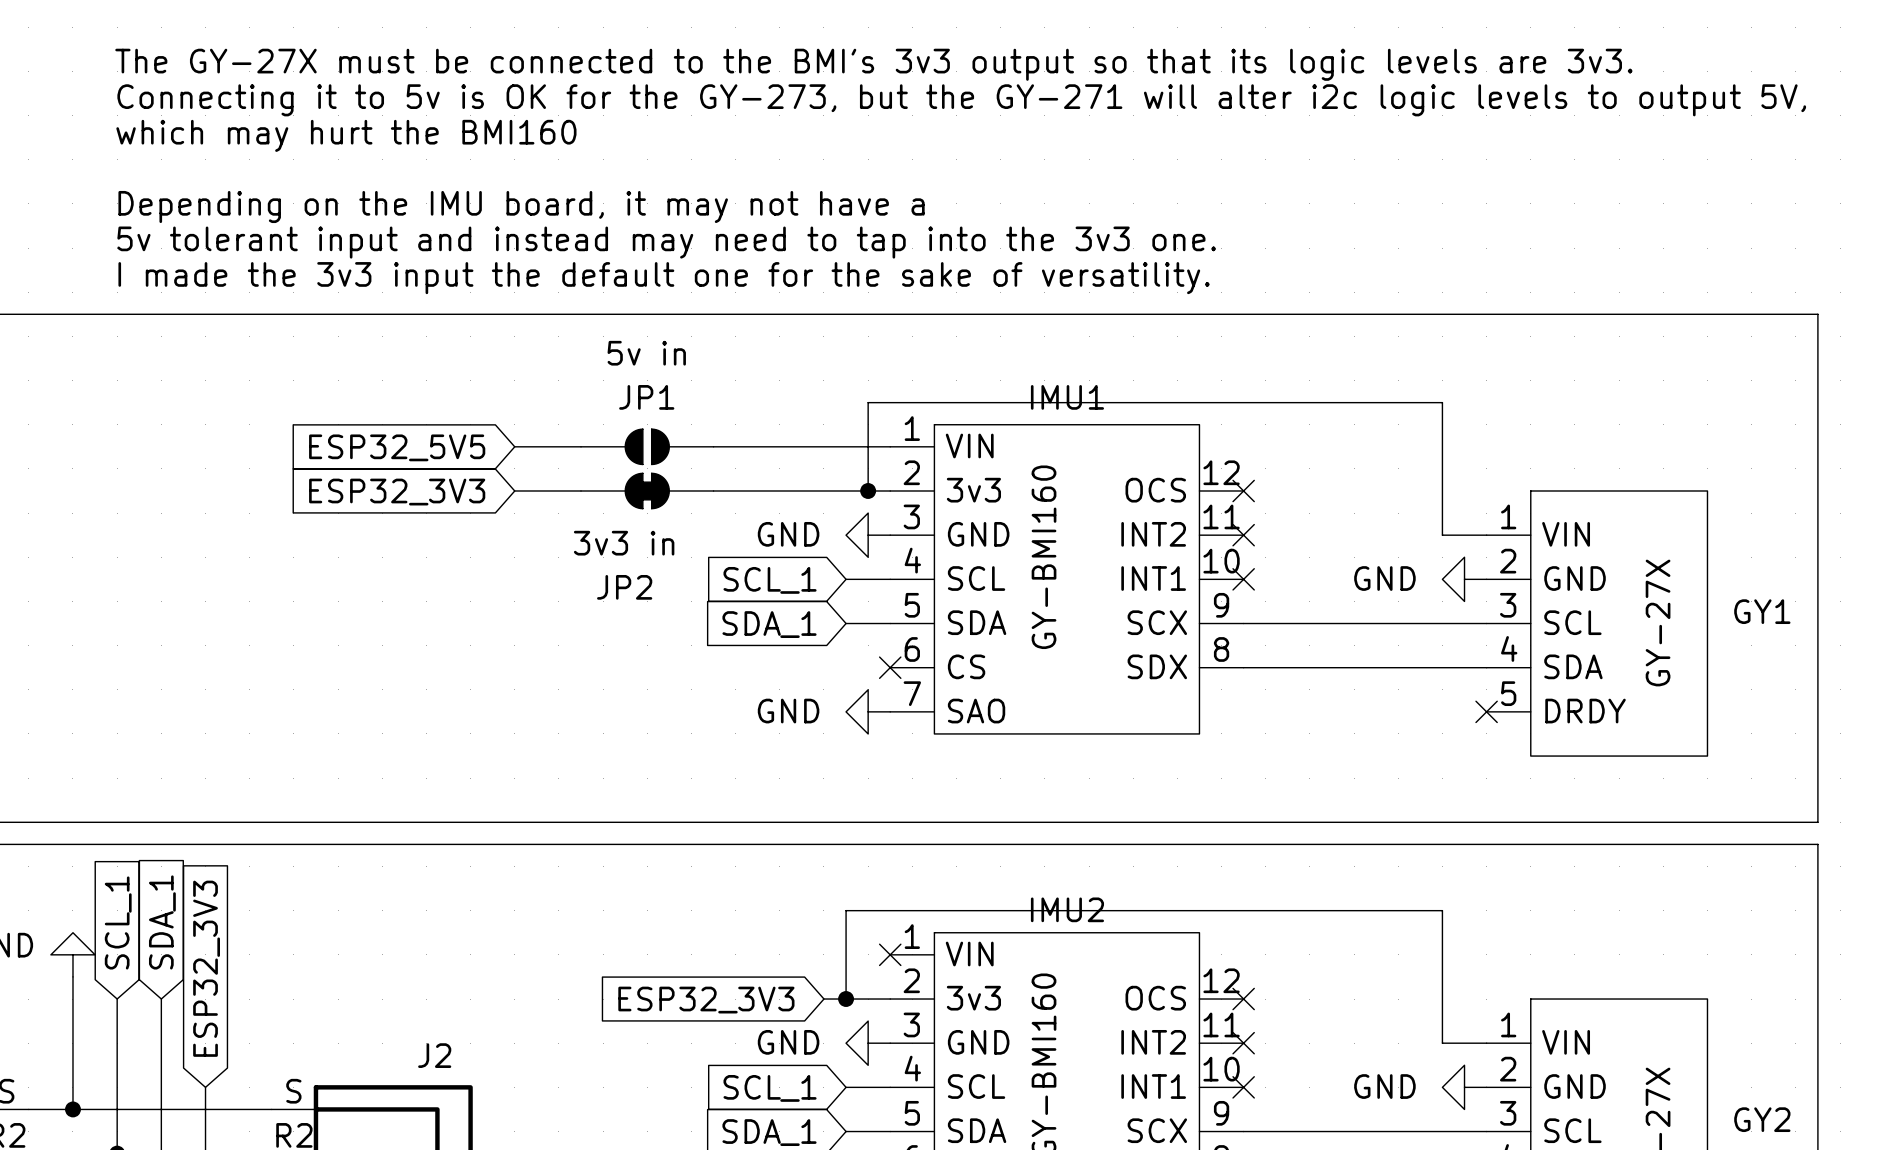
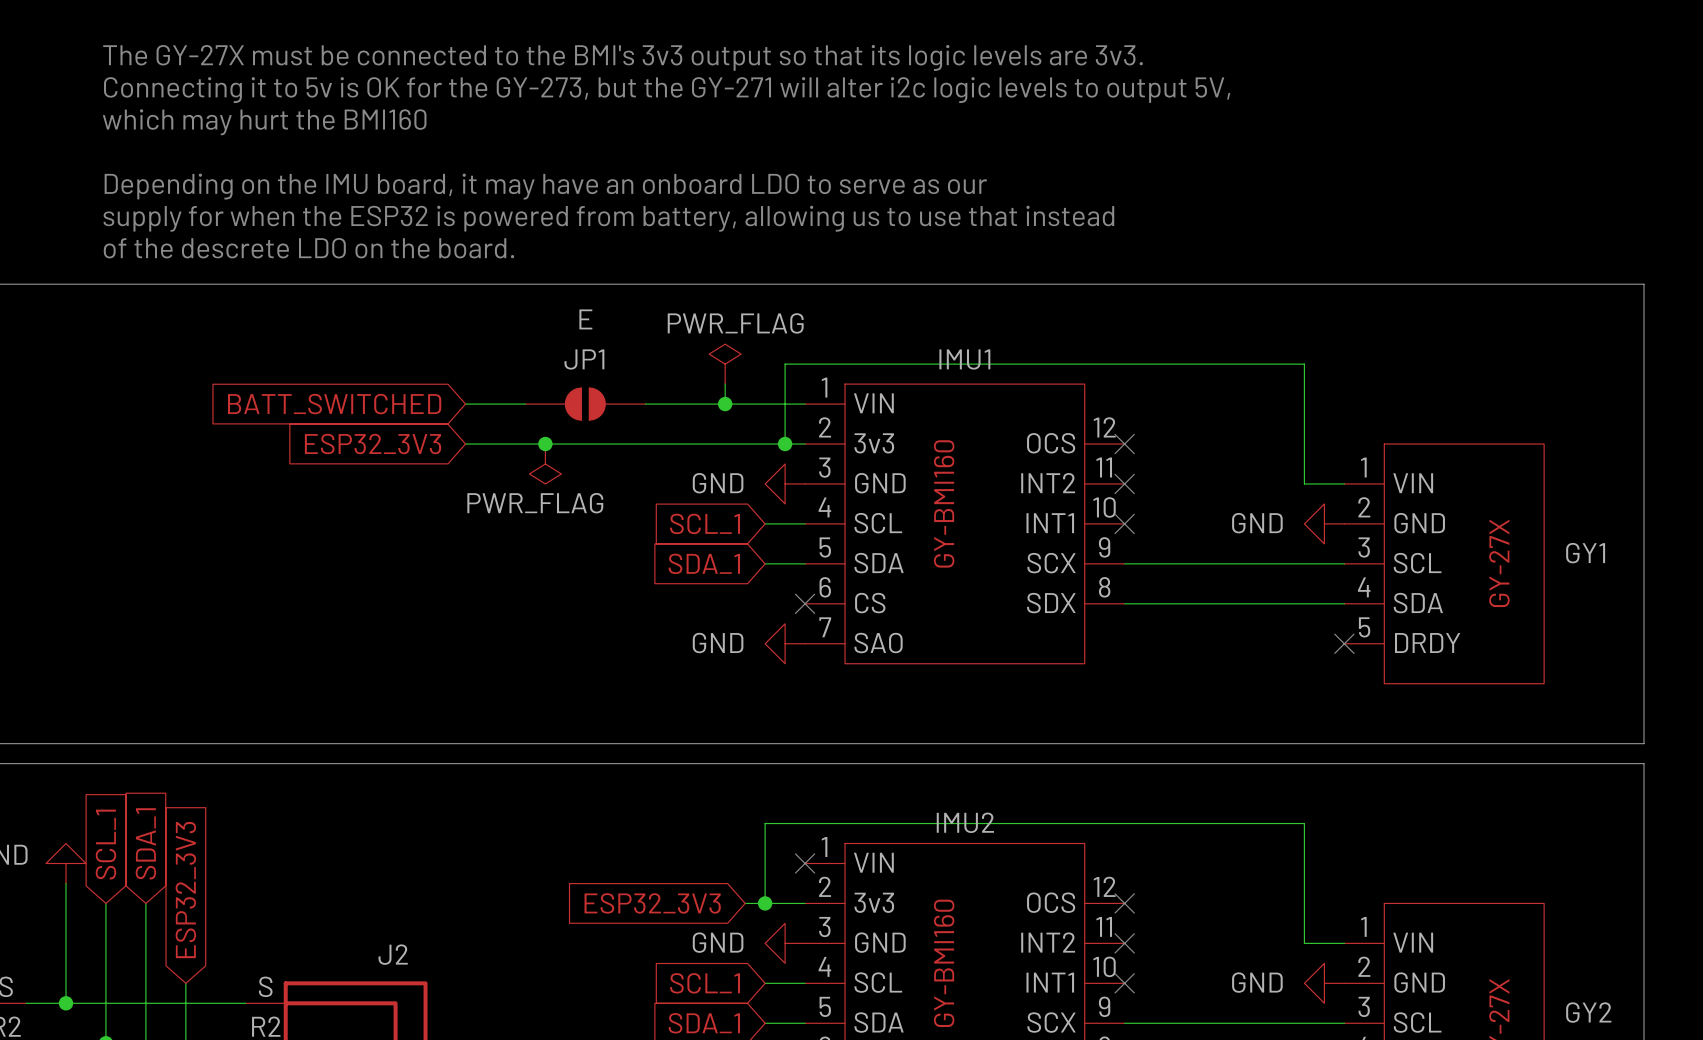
text: Depending on the IMU board, it may not have a (521, 207) -> Depending on the IMU board, it may have an onboard LDO to serve as our (545, 186)
text: 5v tolerant input and instead may need to tap into the 3v3 one. (666, 242) -> supply for when the ESP32 is powered from battery, allowing us to use that instead (608, 218)
text: I made the 3v3 input the default one for the sake of versatility. (664, 278) -> of the descrete LDO on the board. (308, 248)
JP1 value: 5v in (646, 353) -> E (585, 319)
power symbol: none -> PWR_FLAG (725, 364)
wire: none -> (725, 384) (725, 404)
junction: none -> (725, 404)
global label: ESP32_5V5 (397, 447) -> BATT_SWITCHED (334, 404)
junction: none -> (545, 444)
JP2: 3v3 in (647, 490) -> none
power symbol: none -> PWR_FLAG (545, 463)

